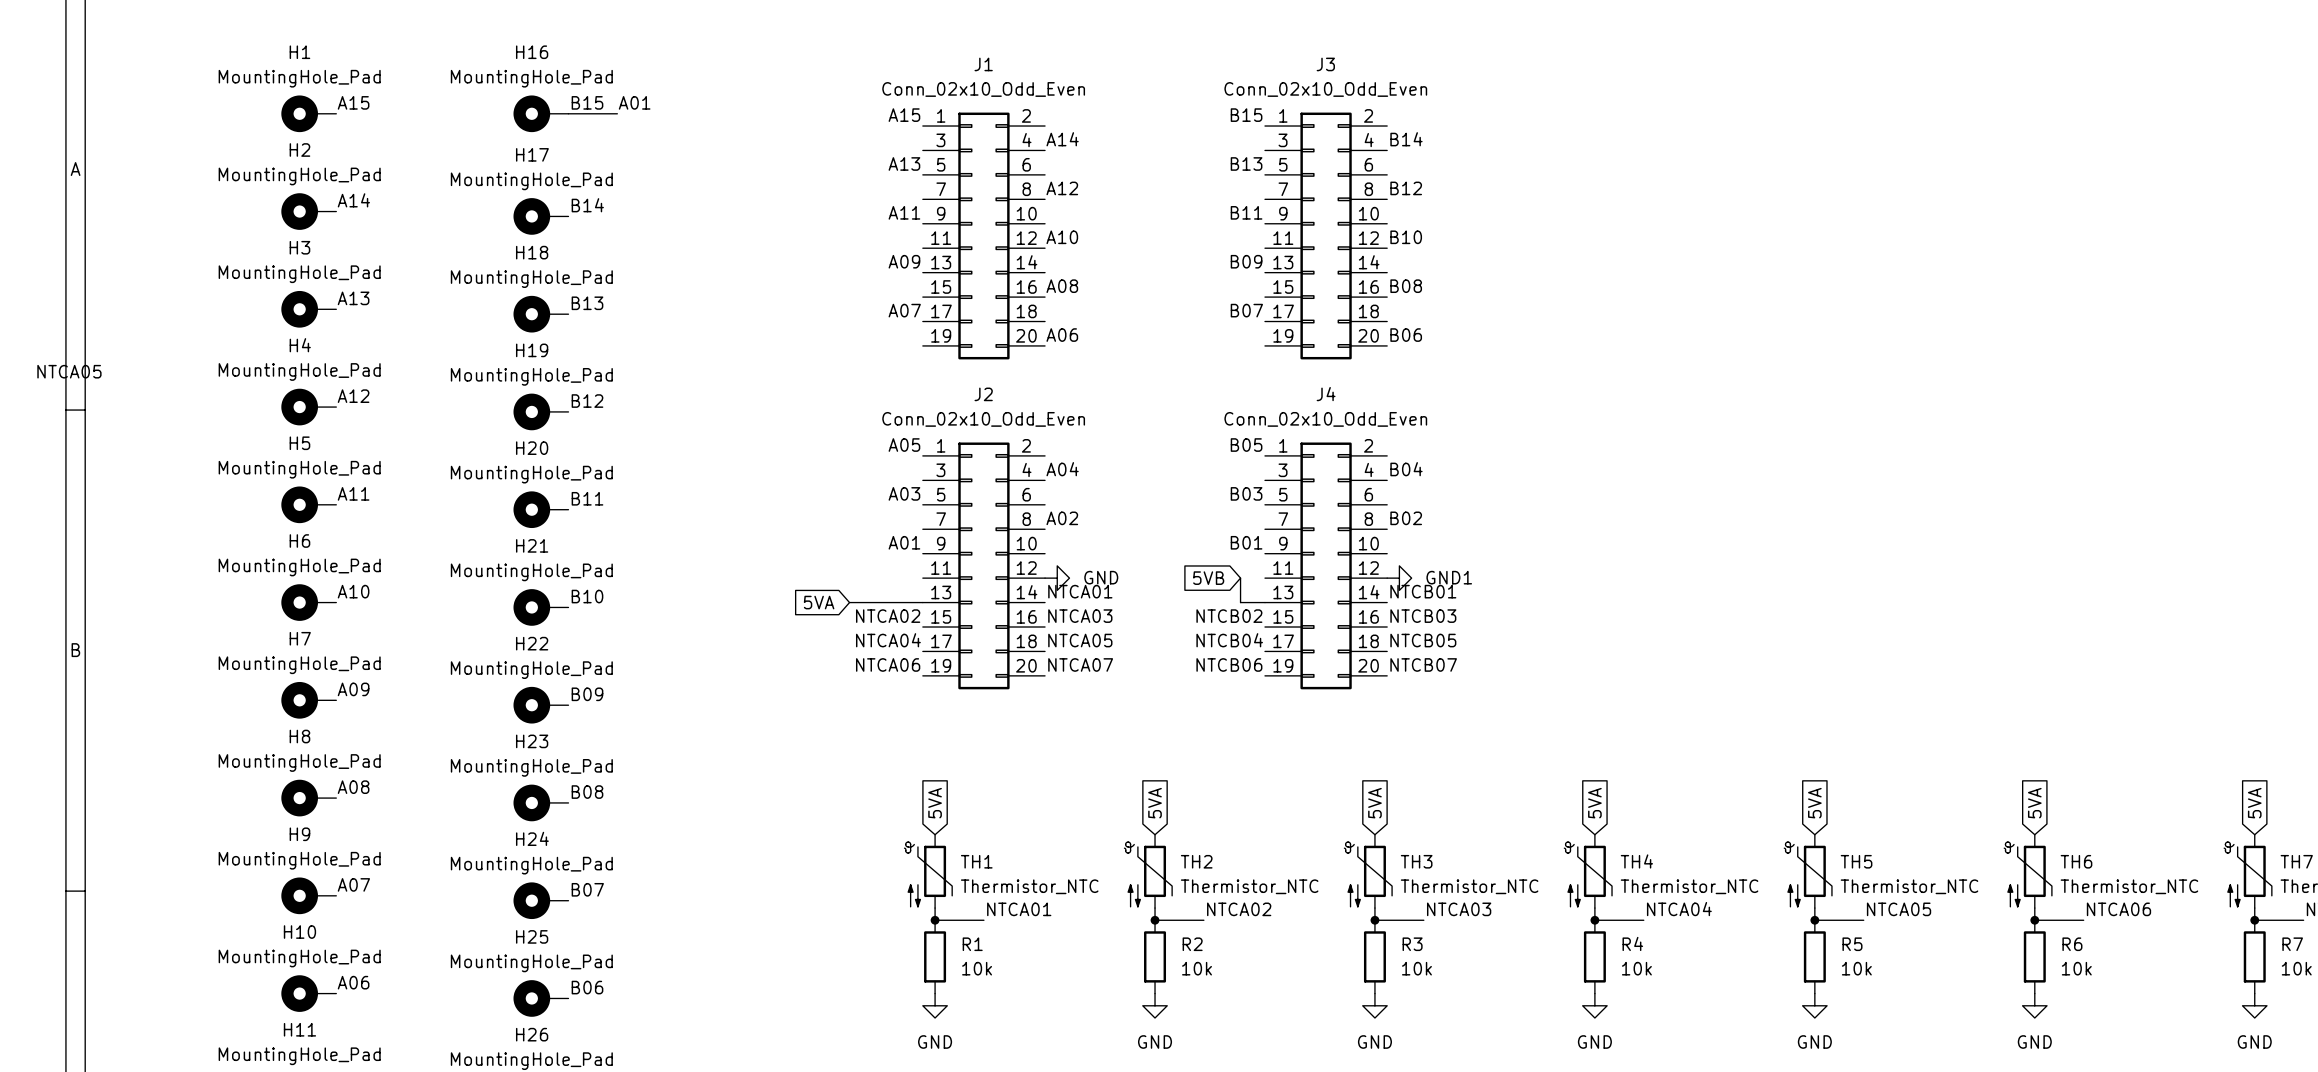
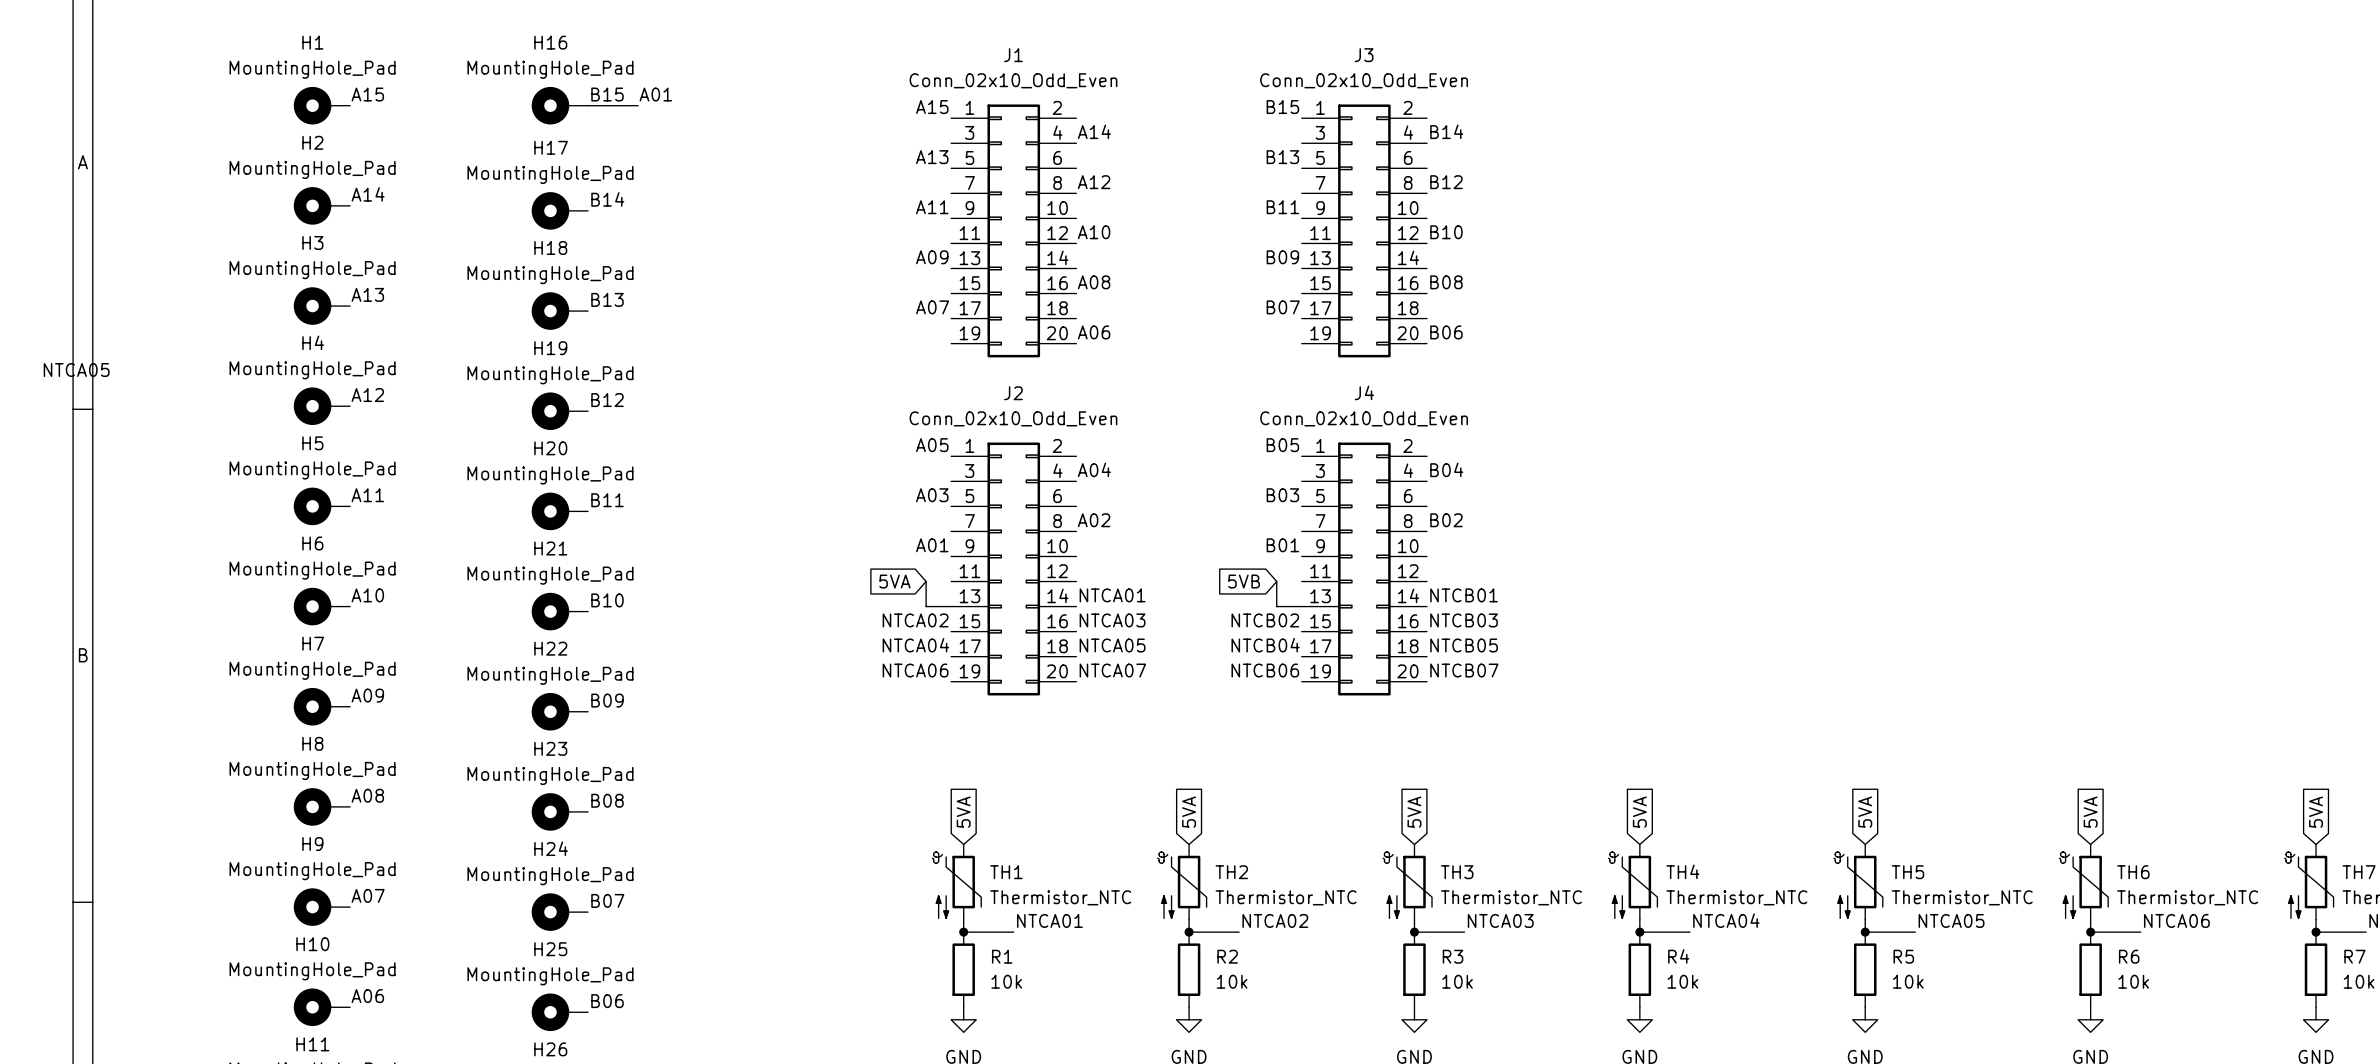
power symbol: GND (1057, 578) -> none
power symbol: GND1 (1399, 578) -> none
global label position: 5VA (819, 602) -> 5VA (894, 581)
wire: (849, 602) (898, 602) -> (926, 581) (926, 606)

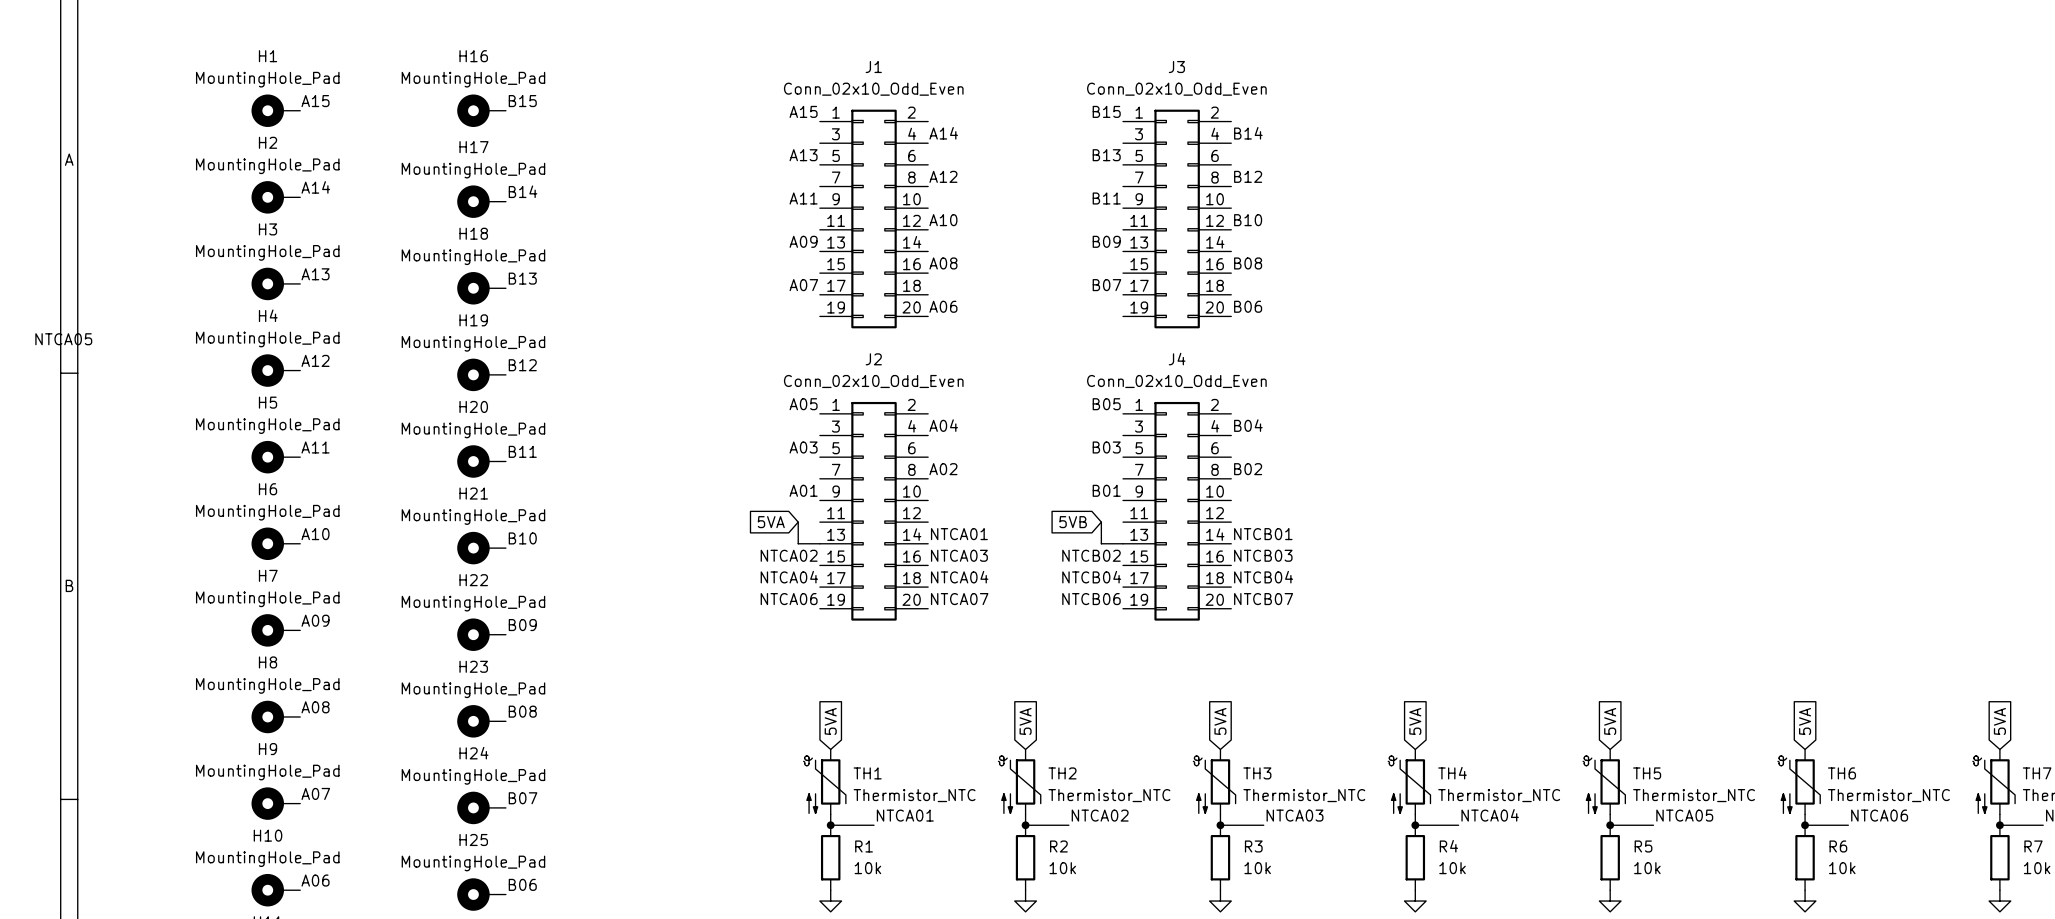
label: A01 (655, 94) -> none
wire: (588, 105) (638, 105) -> none
label: NTCA05 (1112, 645) -> NTCA04 (959, 577)
label: NTCB05 (1464, 645) -> NTCB04 (1263, 577)

